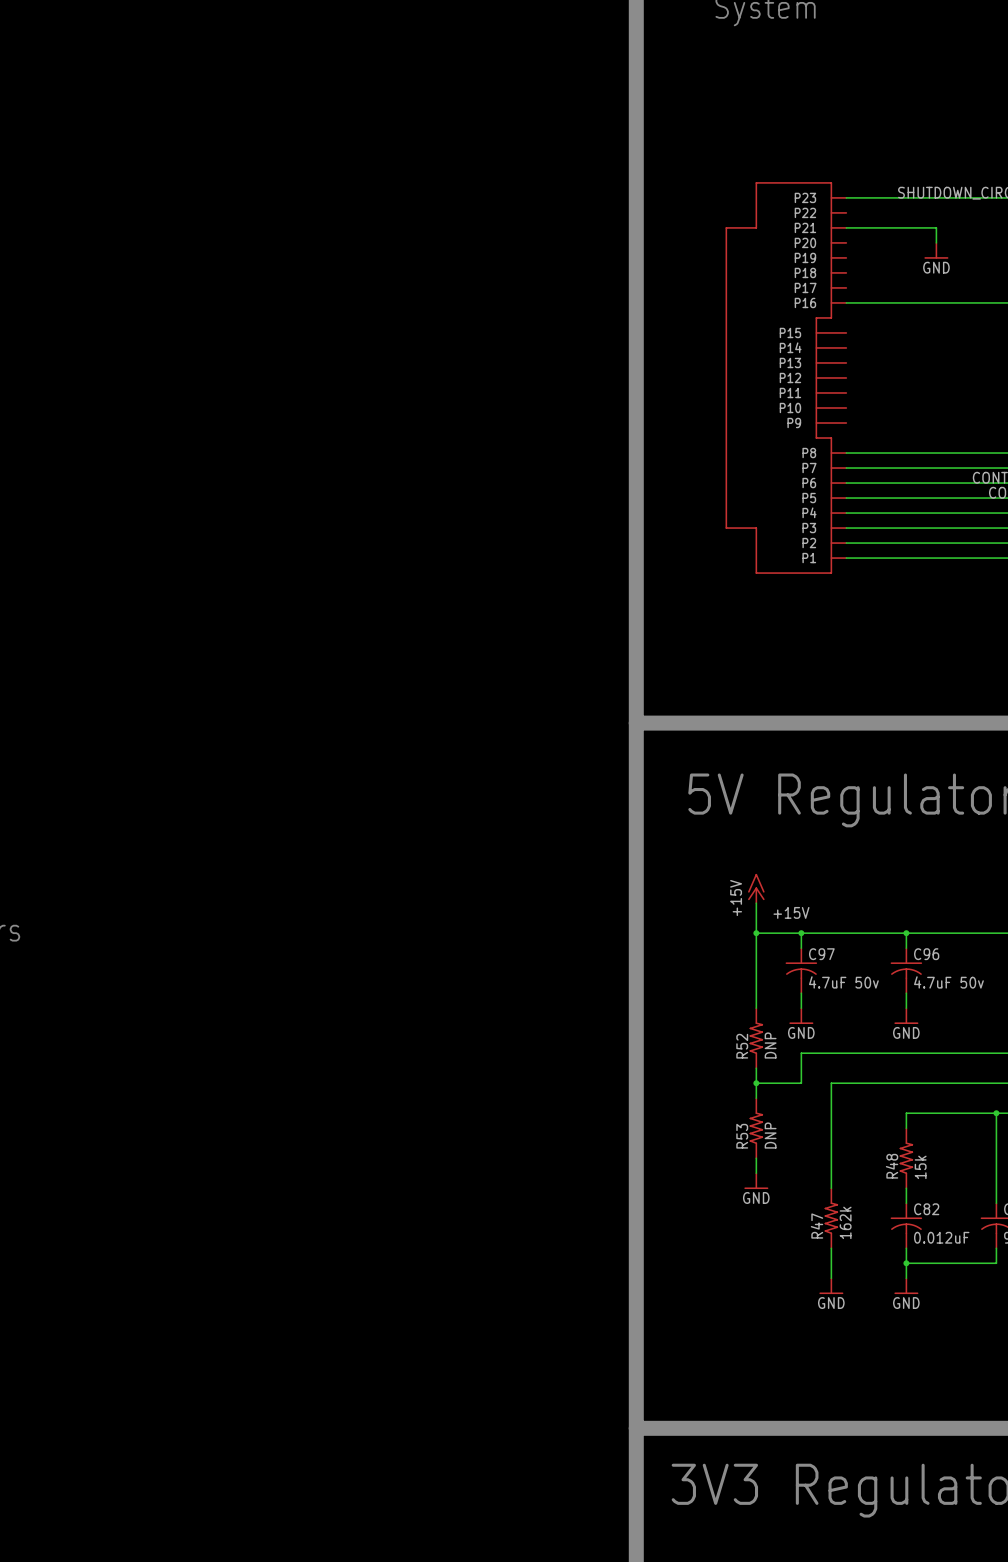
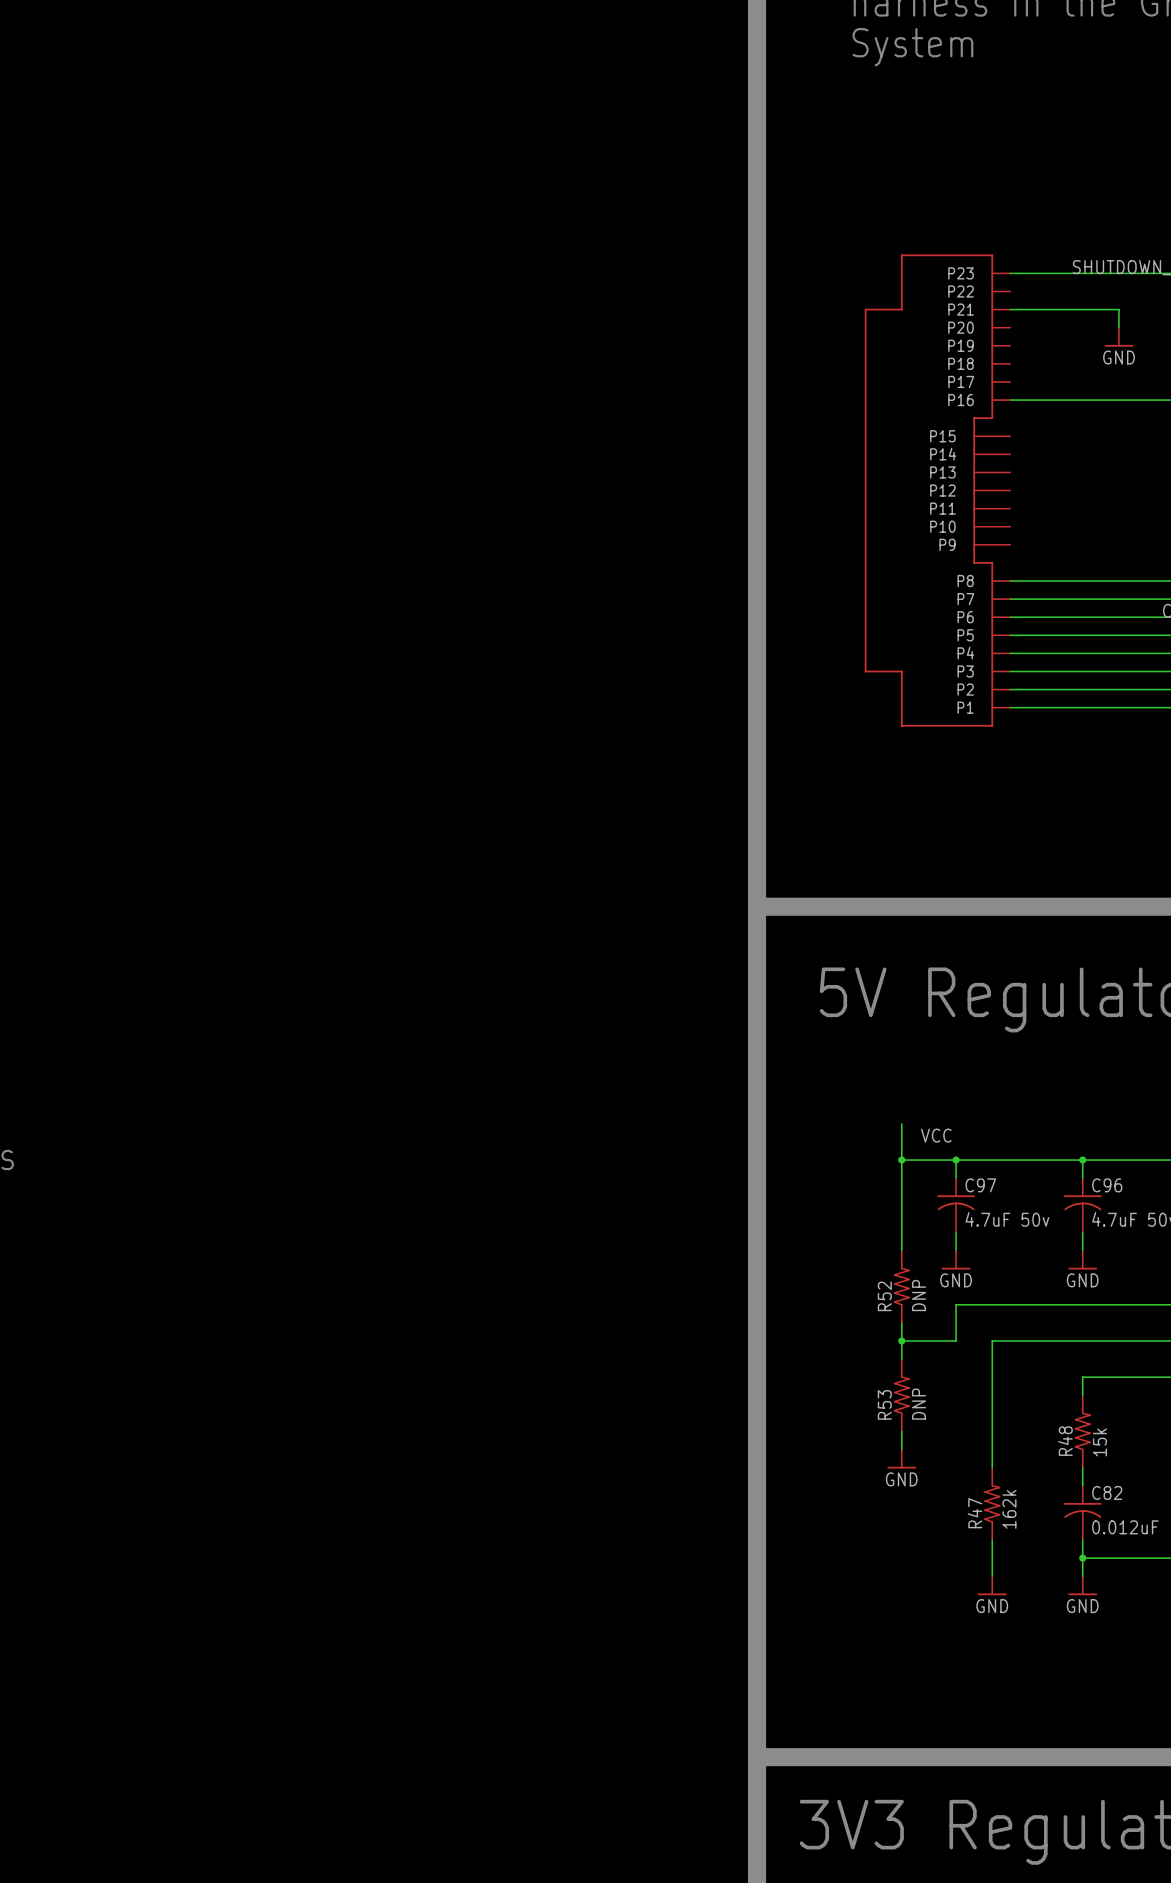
power symbol: +15V (756, 888) -> none
label: +15V (791, 912) -> VCC (936, 1135)

